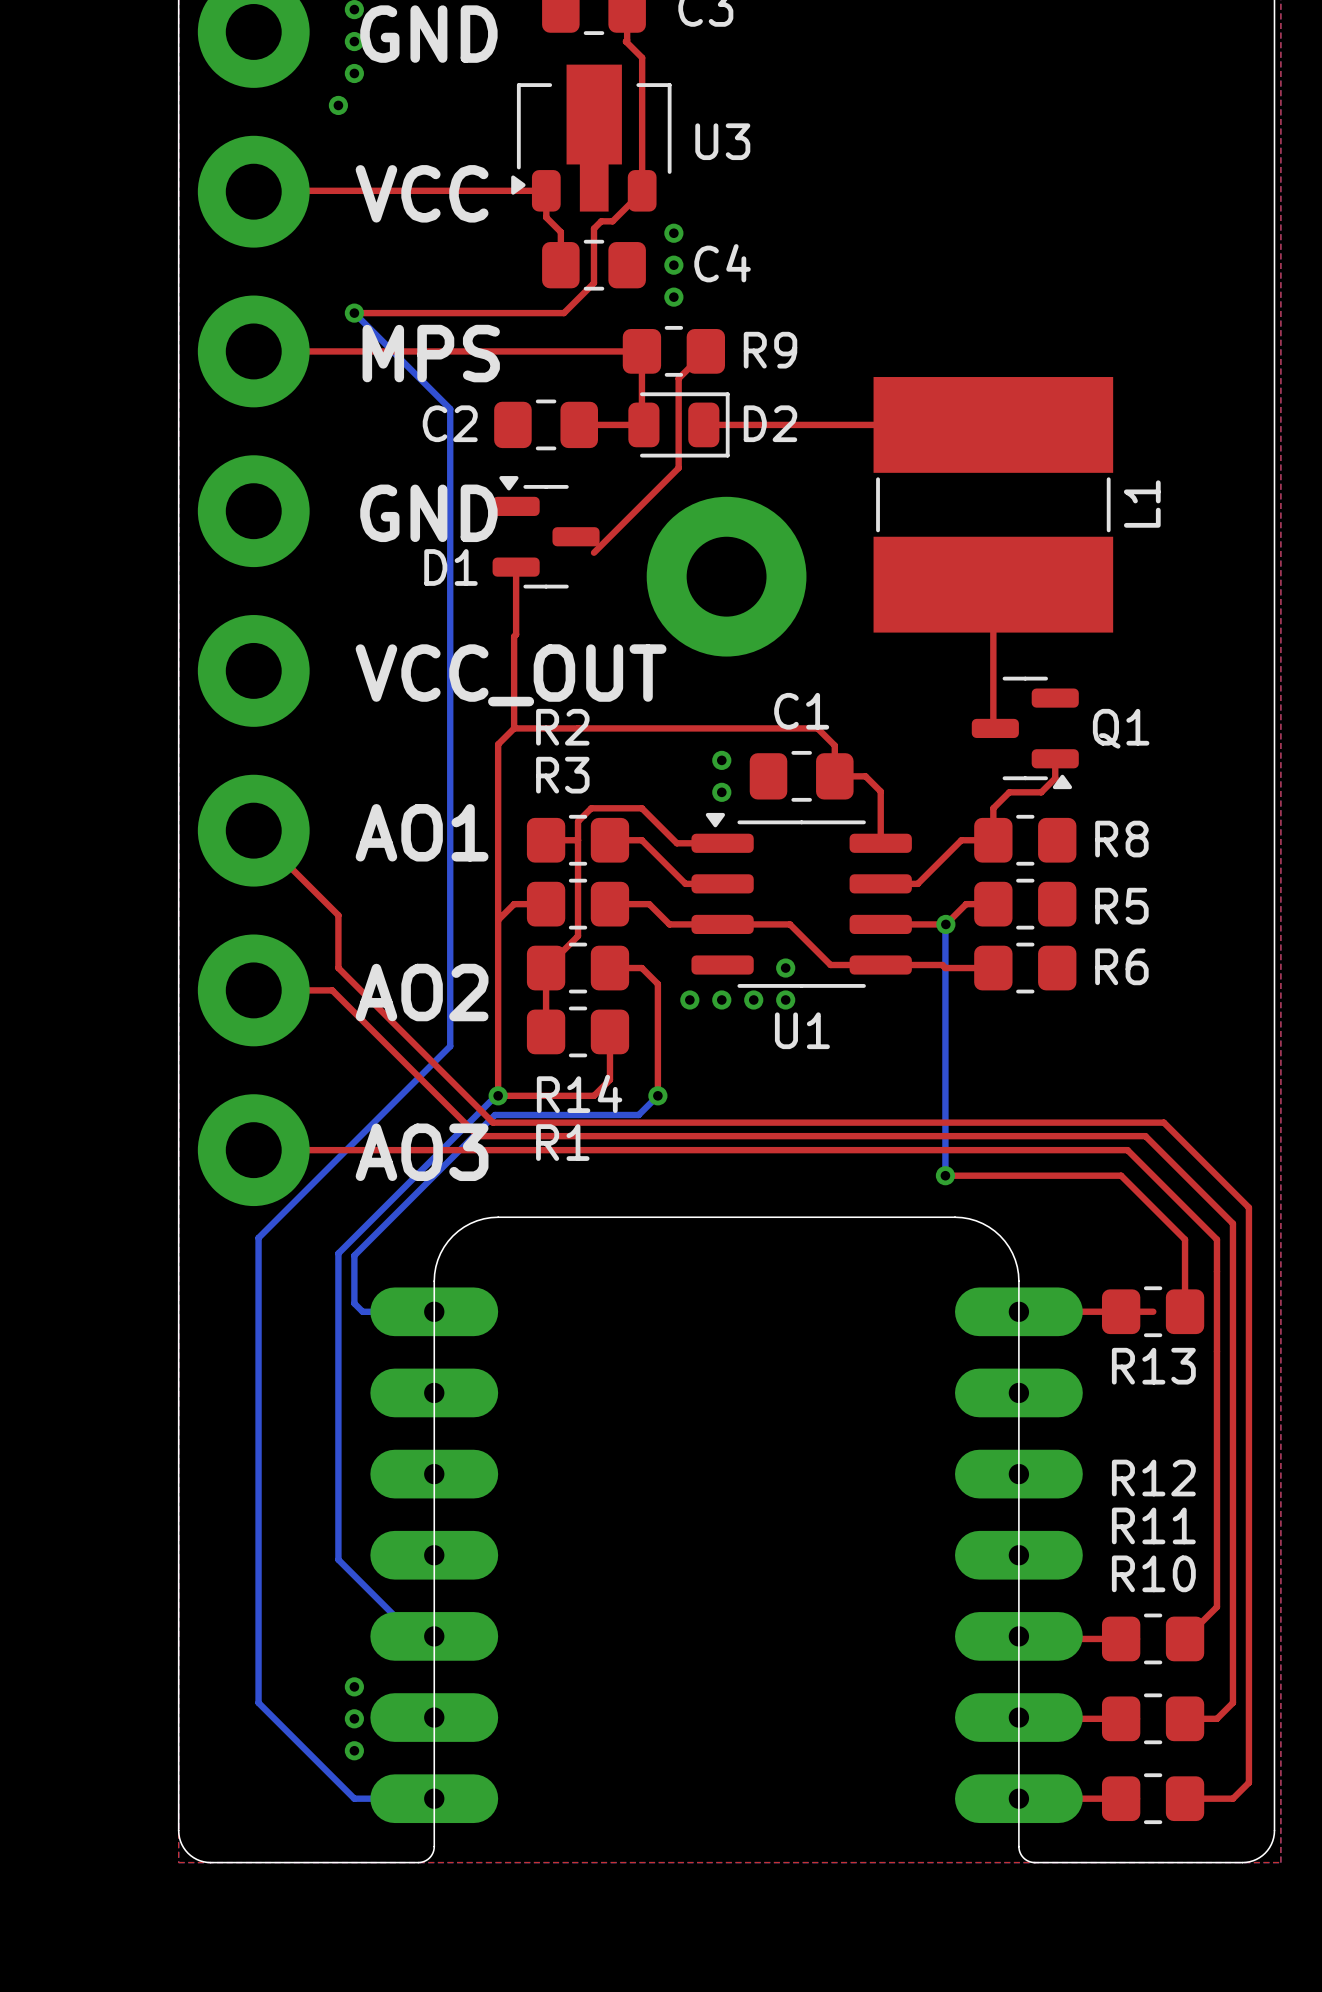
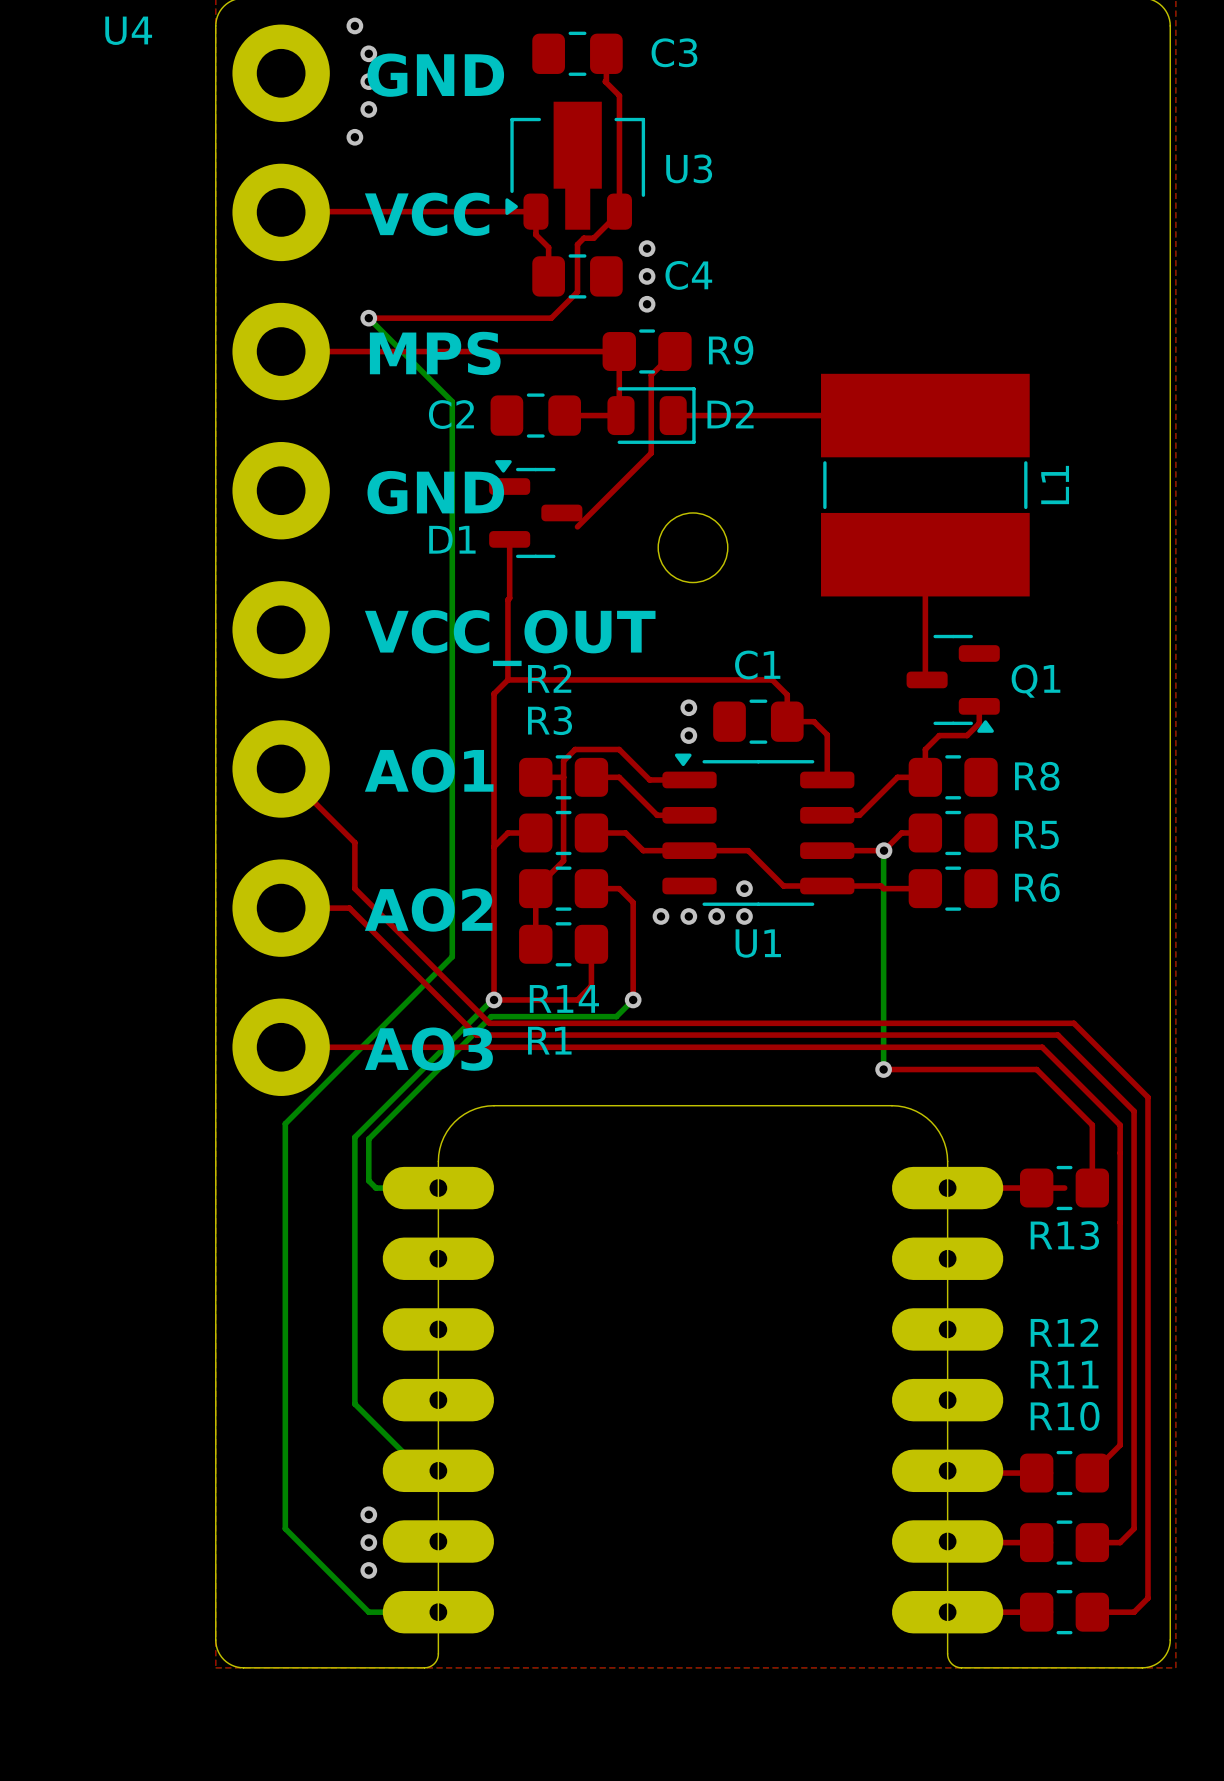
round board edge: none -> [657, 512, 729, 584]
via: (726, 576) -> none

